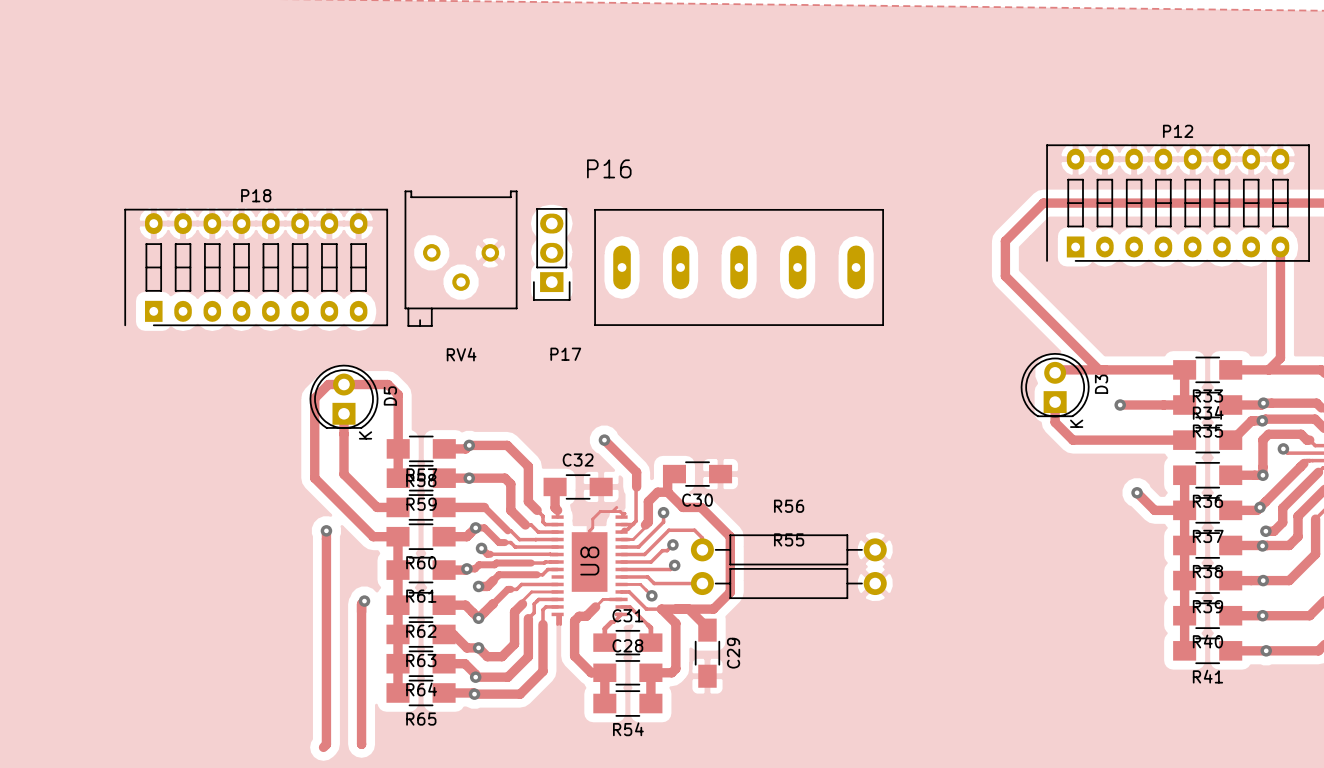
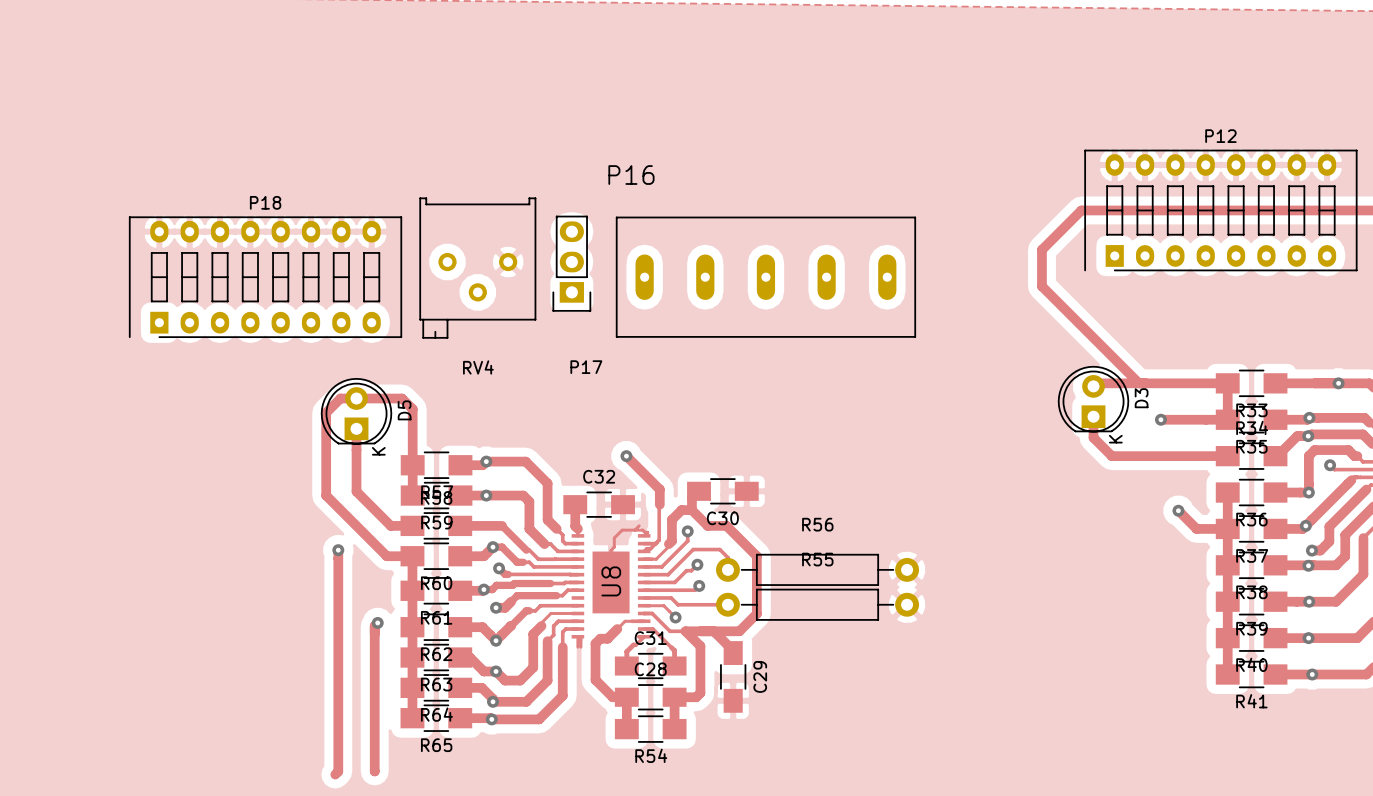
track: (1280, 246) (1280, 358) (1268, 369) -> none
via: none -> (1338, 383)

